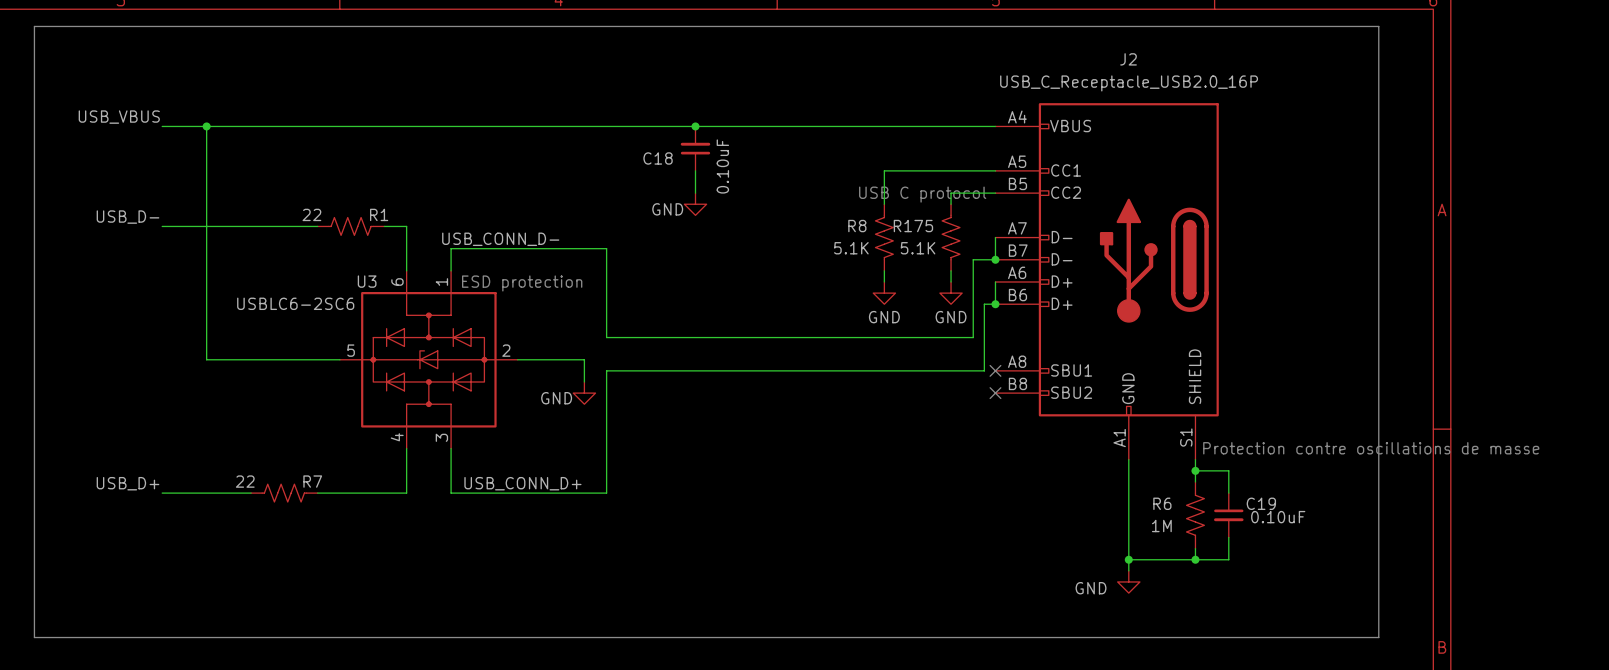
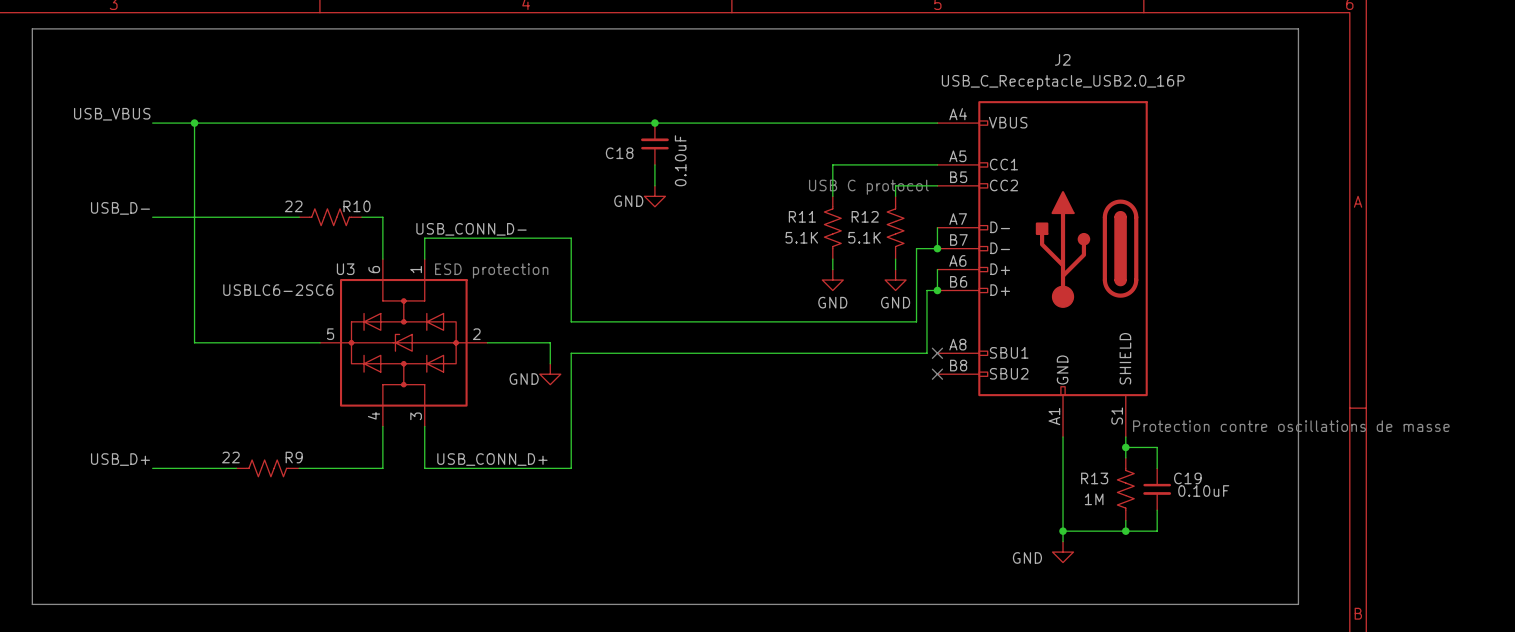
R1 name: R1 (379, 214) -> R10 (356, 206)
R8 name: R8 (857, 226) -> R11 (802, 216)
R175 name: R175 (913, 226) -> R12 (865, 216)
R7 name: R7 (312, 481) -> R9 (294, 457)
R6 name: R6 (1162, 503) -> R13 (1094, 478)

